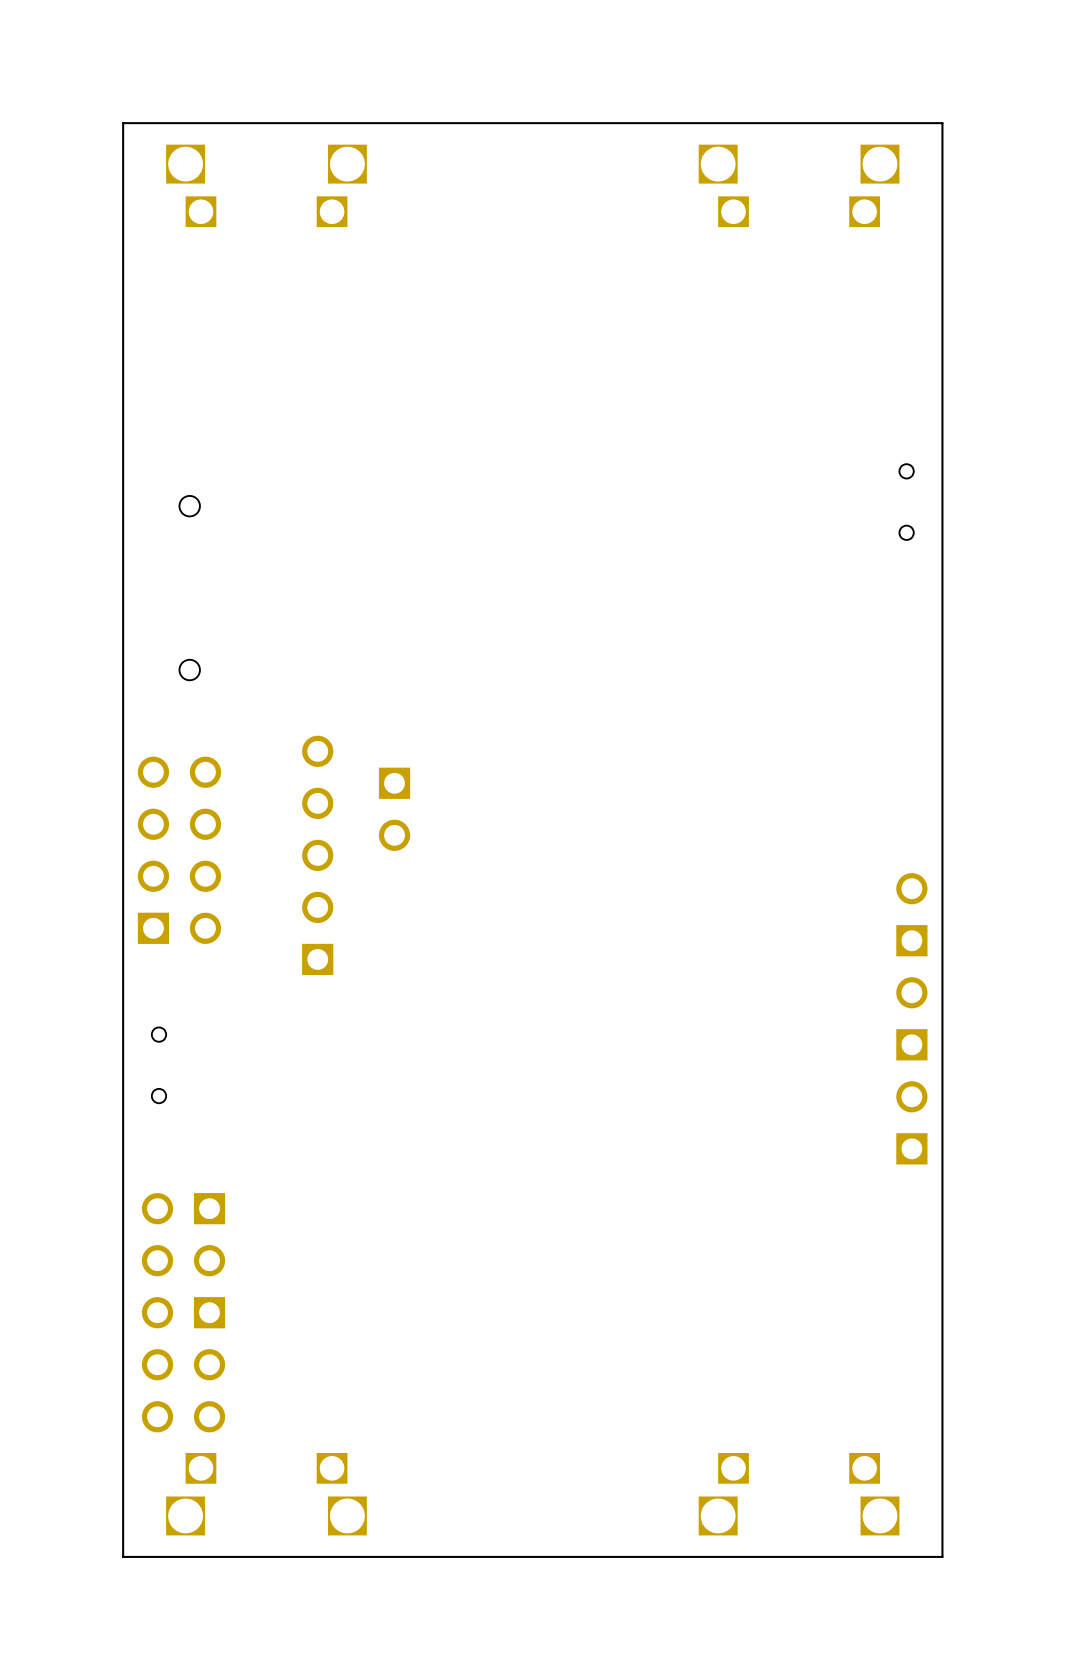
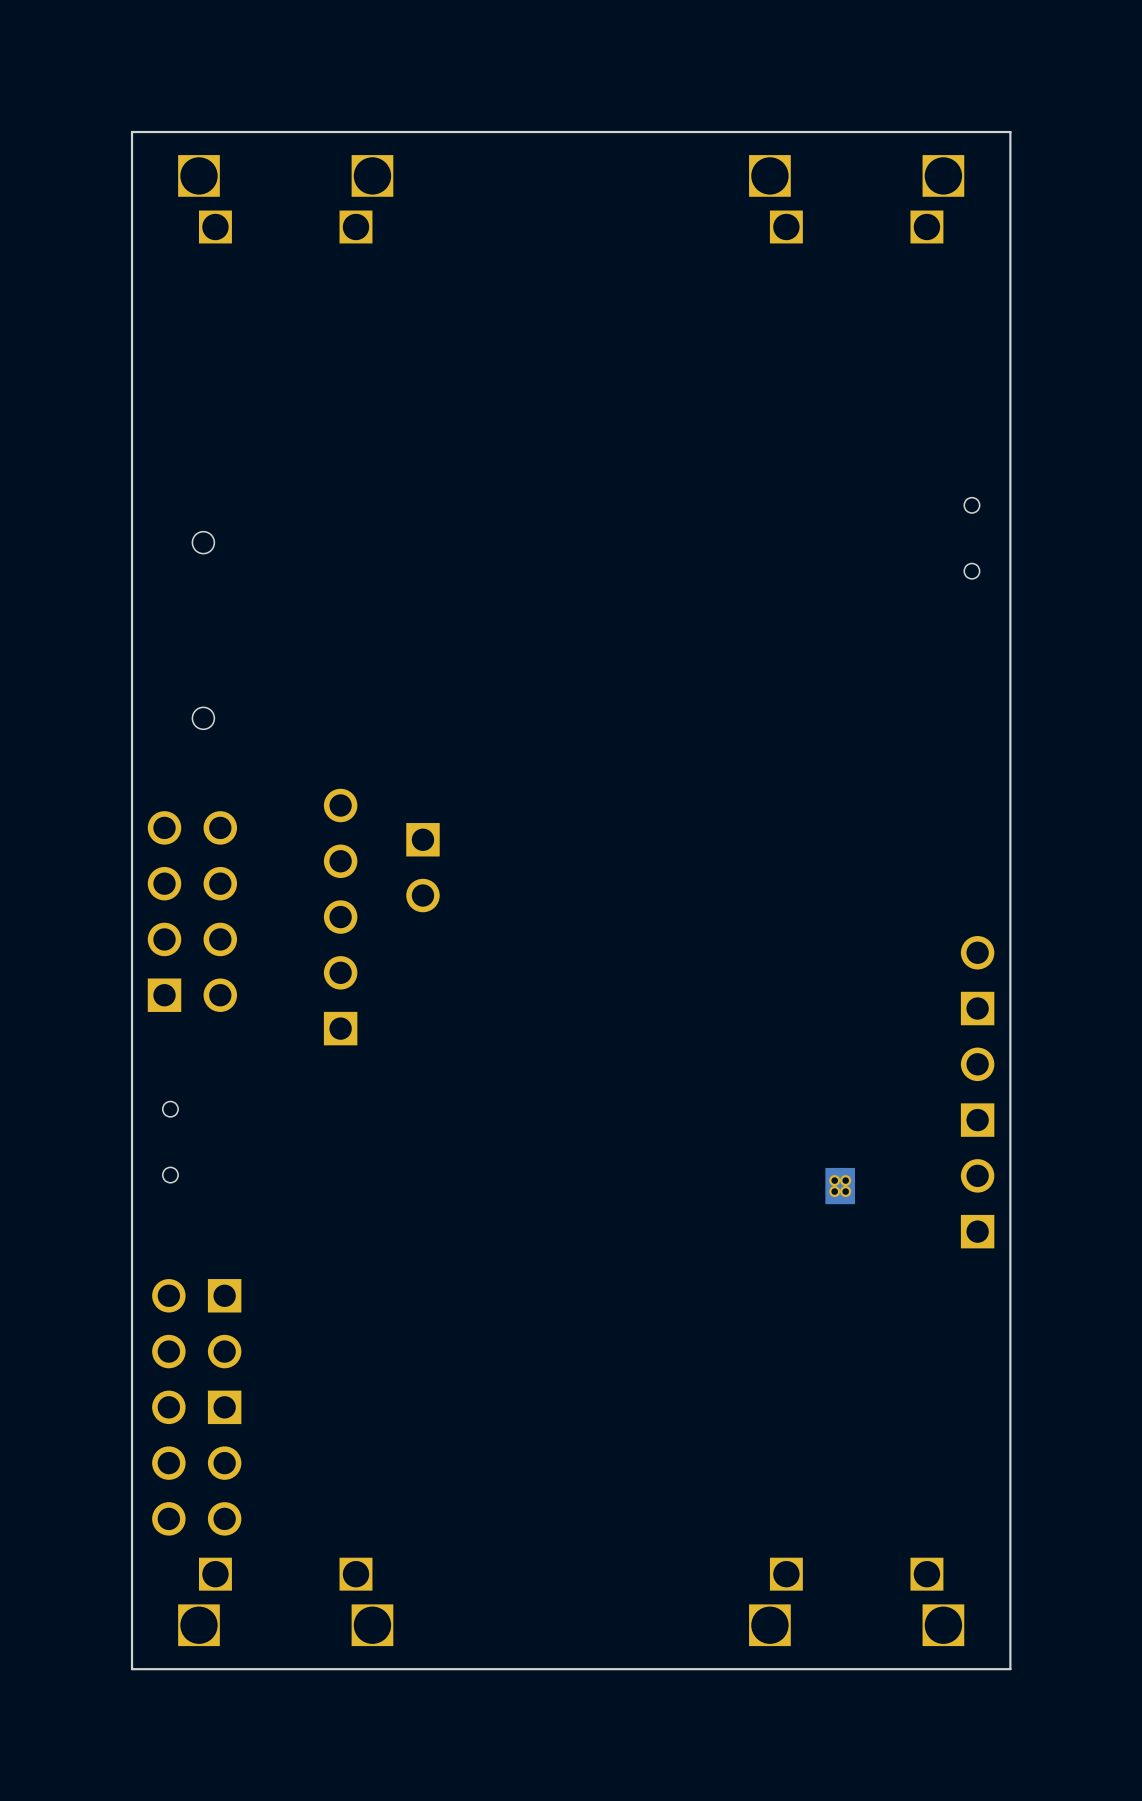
part: none -> (840, 1186)

